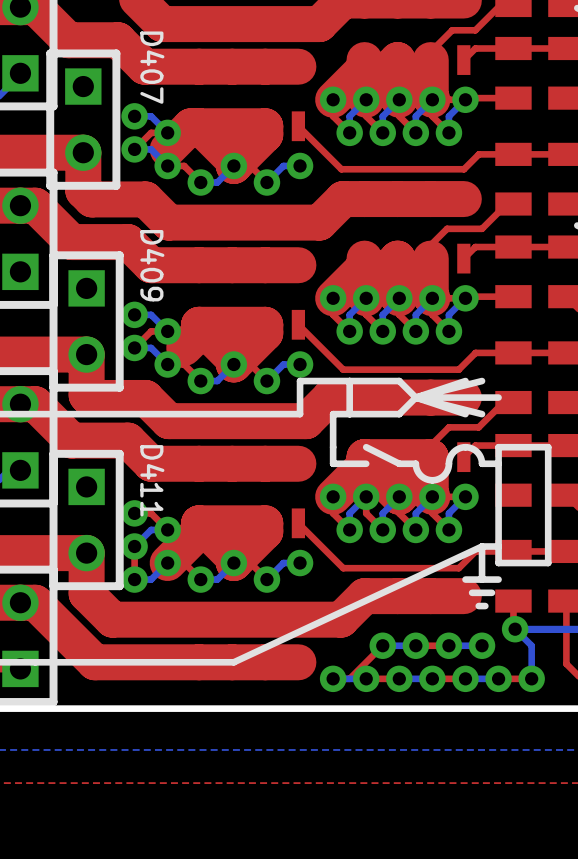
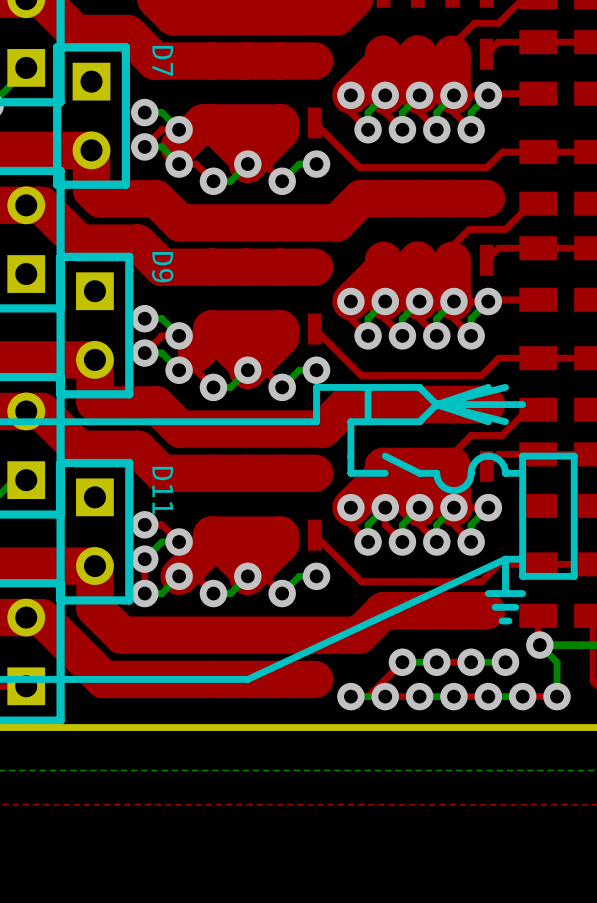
D407 name: D407 (152, 67) -> D7 (162, 60)
D409 name: D409 (152, 265) -> D9 (162, 267)
D411 name: D411 (152, 480) -> D11 (162, 490)

